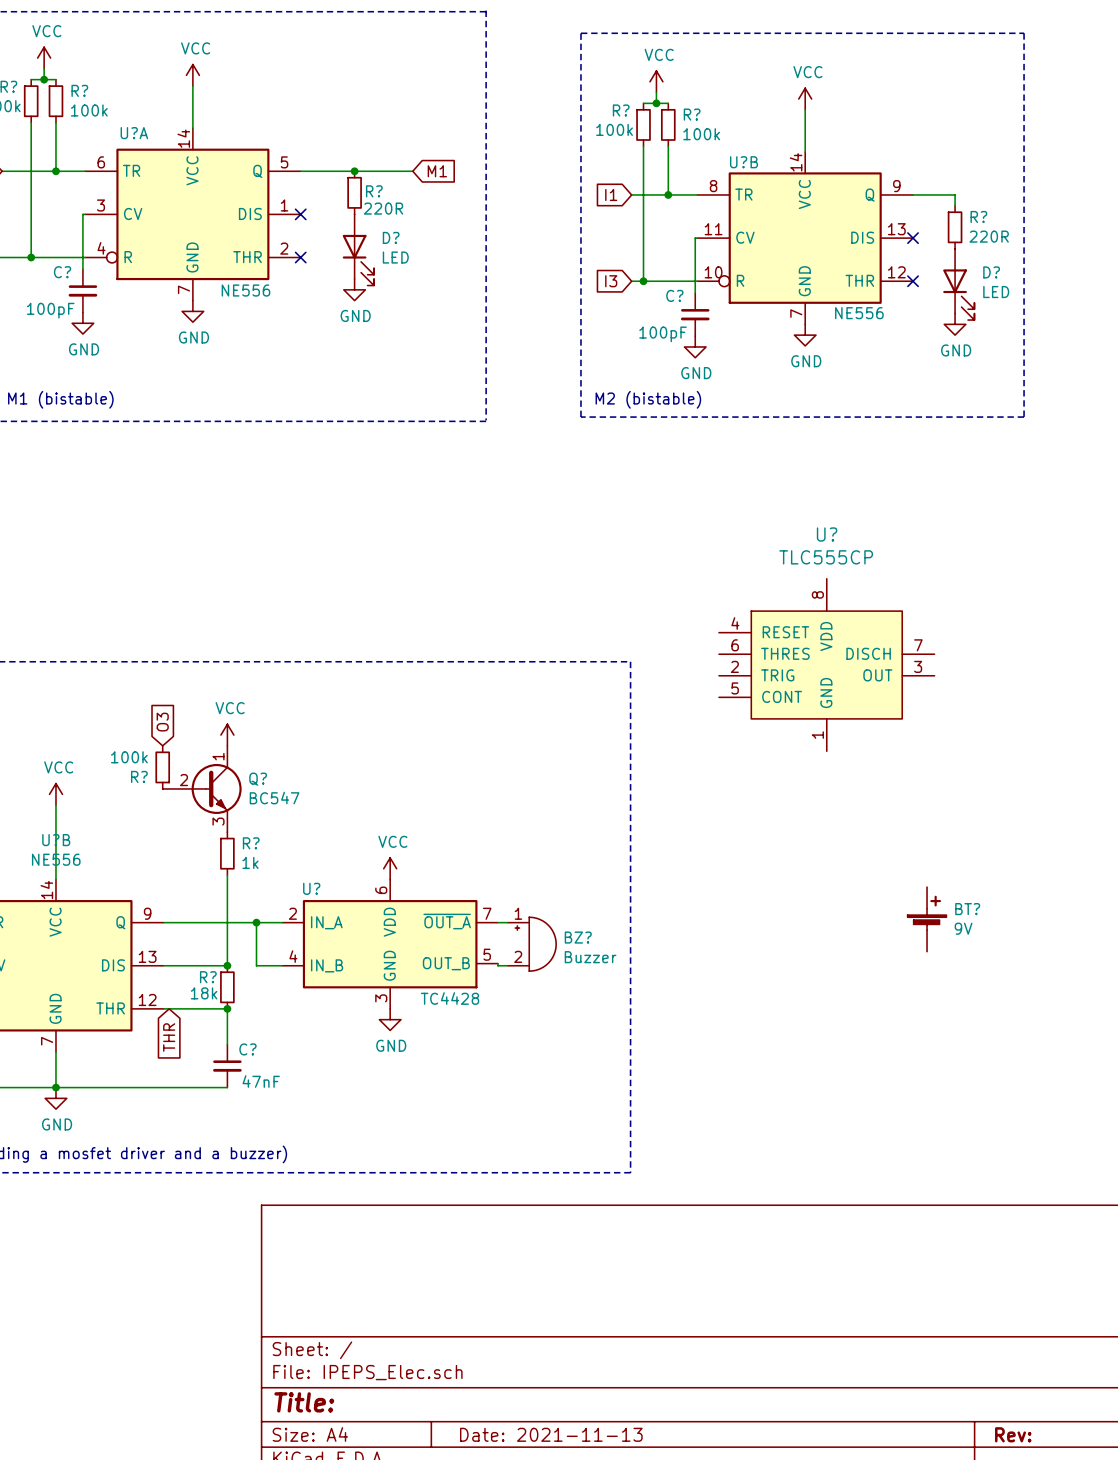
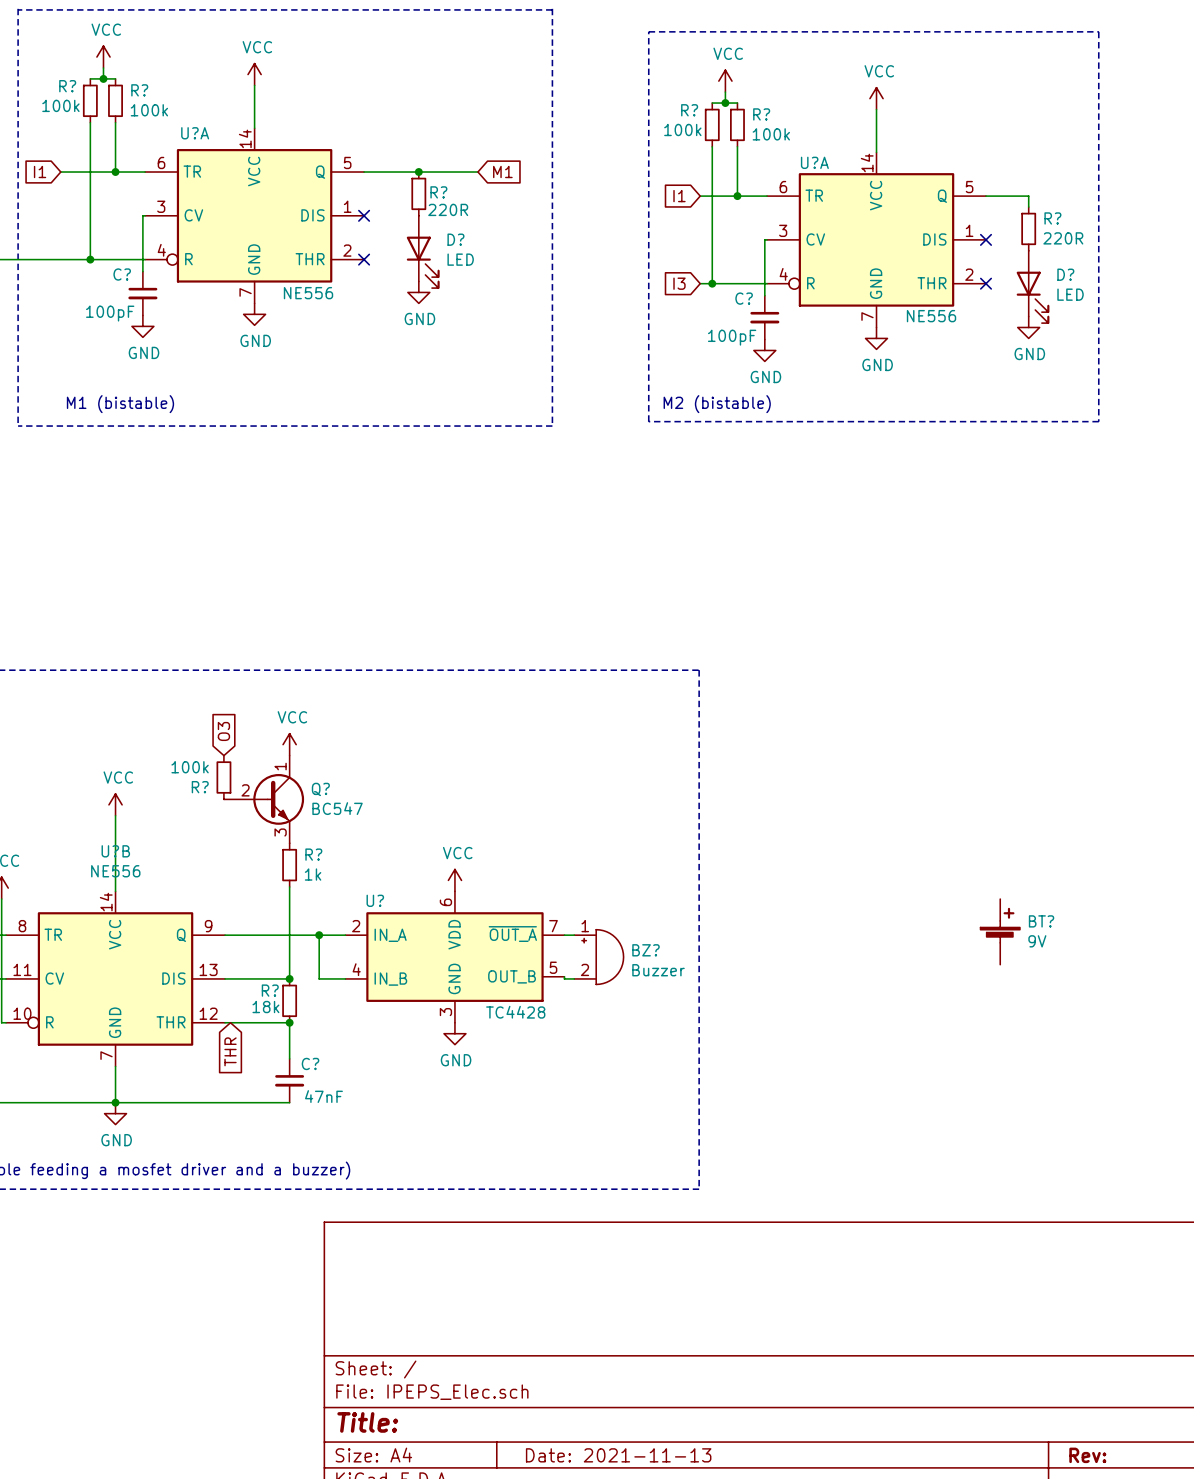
U?B name: U?B (744, 162) -> U?A (814, 162)
U?B pin number: 8 (713, 186) -> 6 (783, 187)
U?B pin number: 9 (896, 186) -> 5 (969, 187)
U?B pin number: 11 (713, 229) -> 3 (783, 230)
U?B pin number: 13 (896, 229) -> 1 (969, 230)
U?B pin number: 10 (713, 272) -> 4 (783, 274)
U?B pin number: 12 (896, 272) -> 2 (969, 274)
U?: TLC555CP (826, 665) -> none

